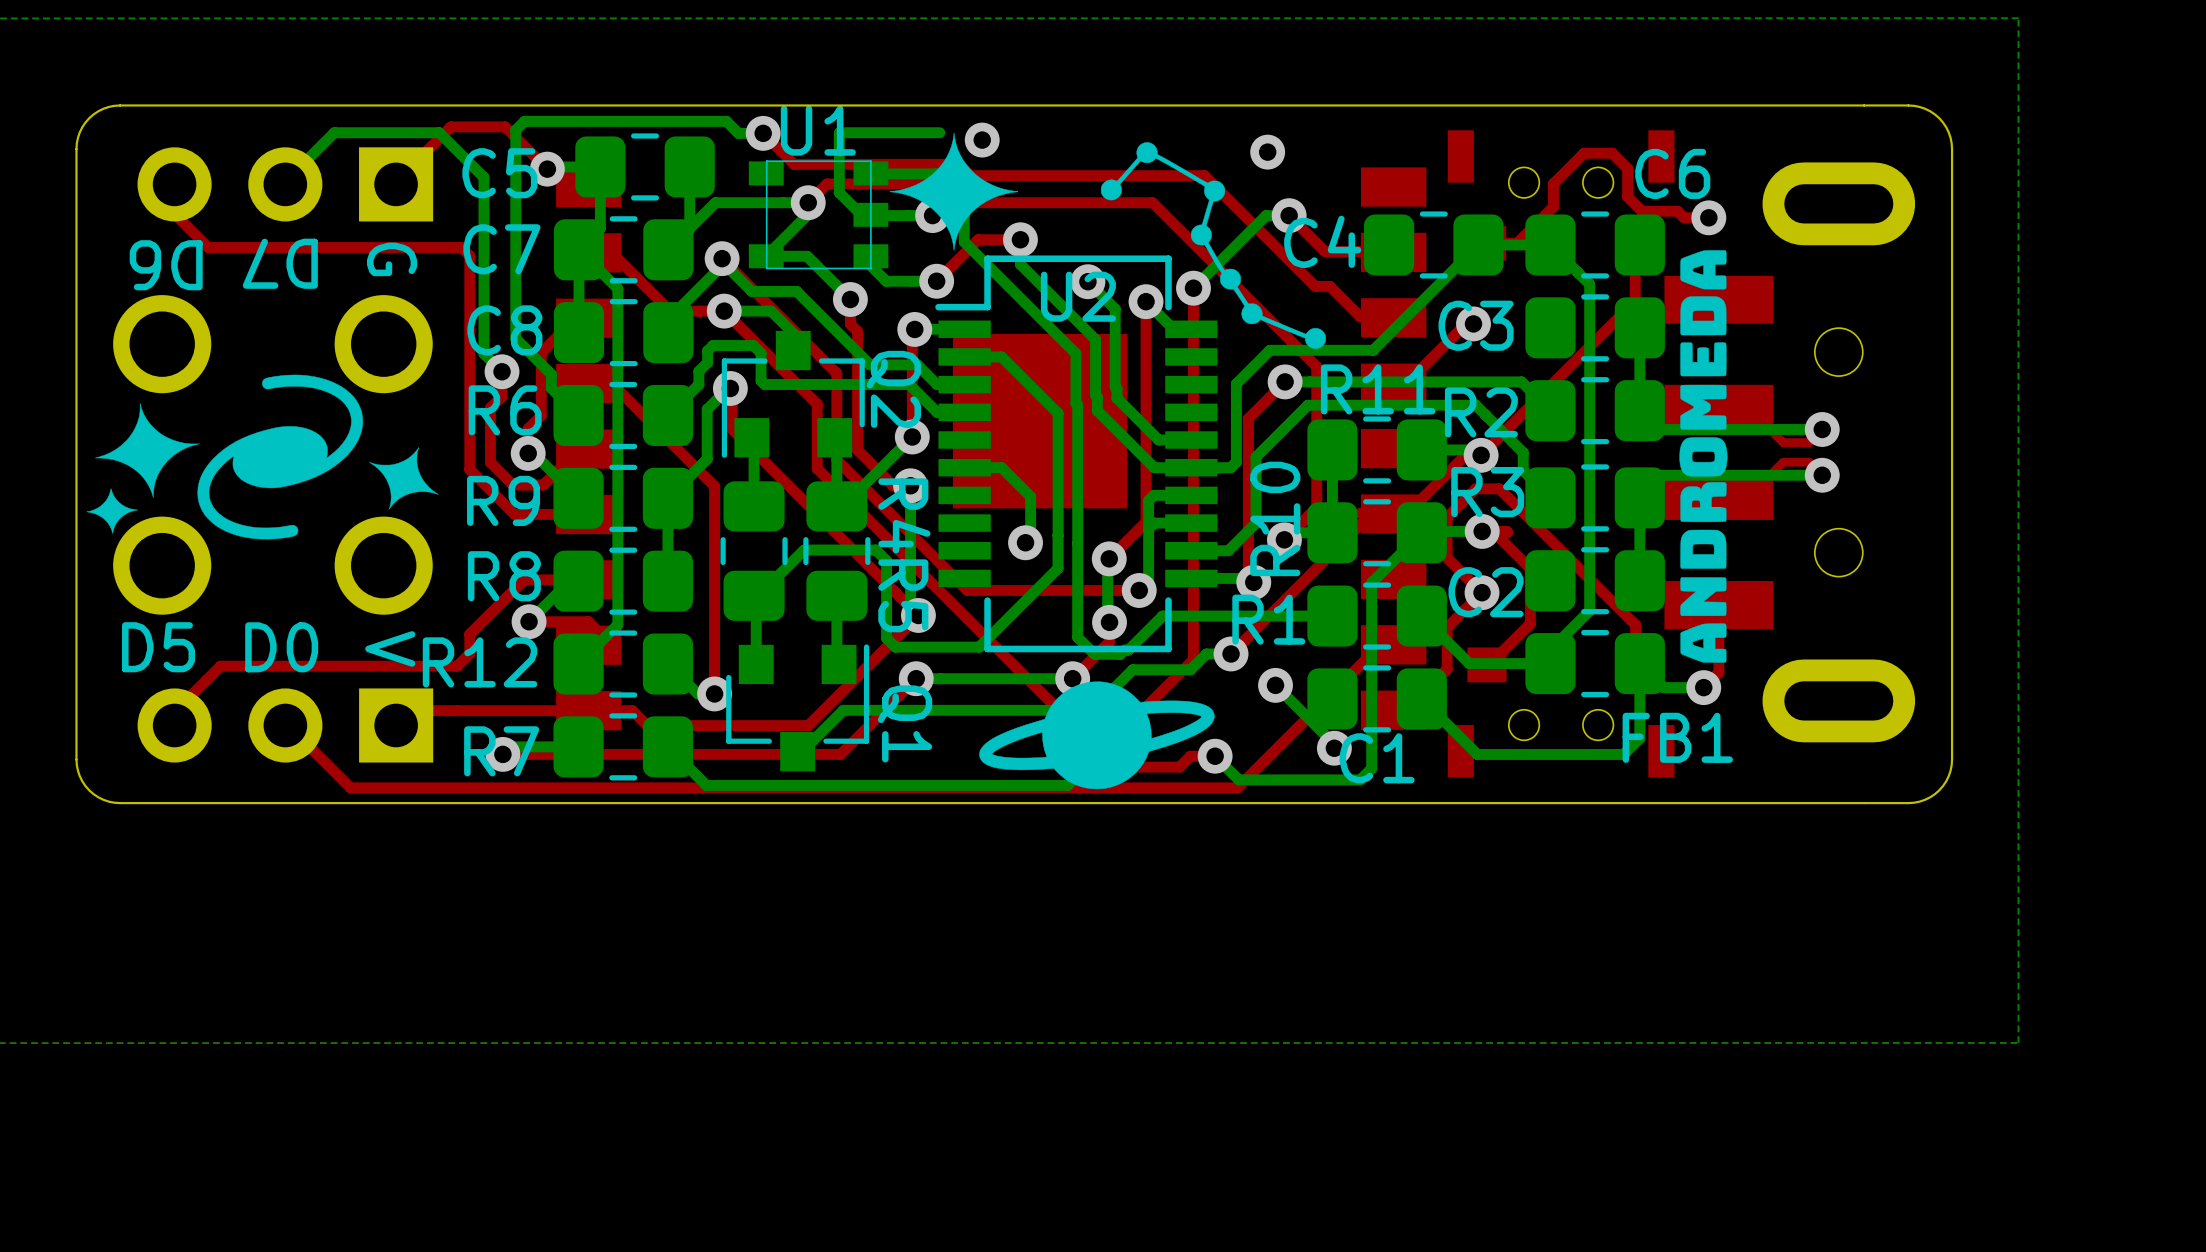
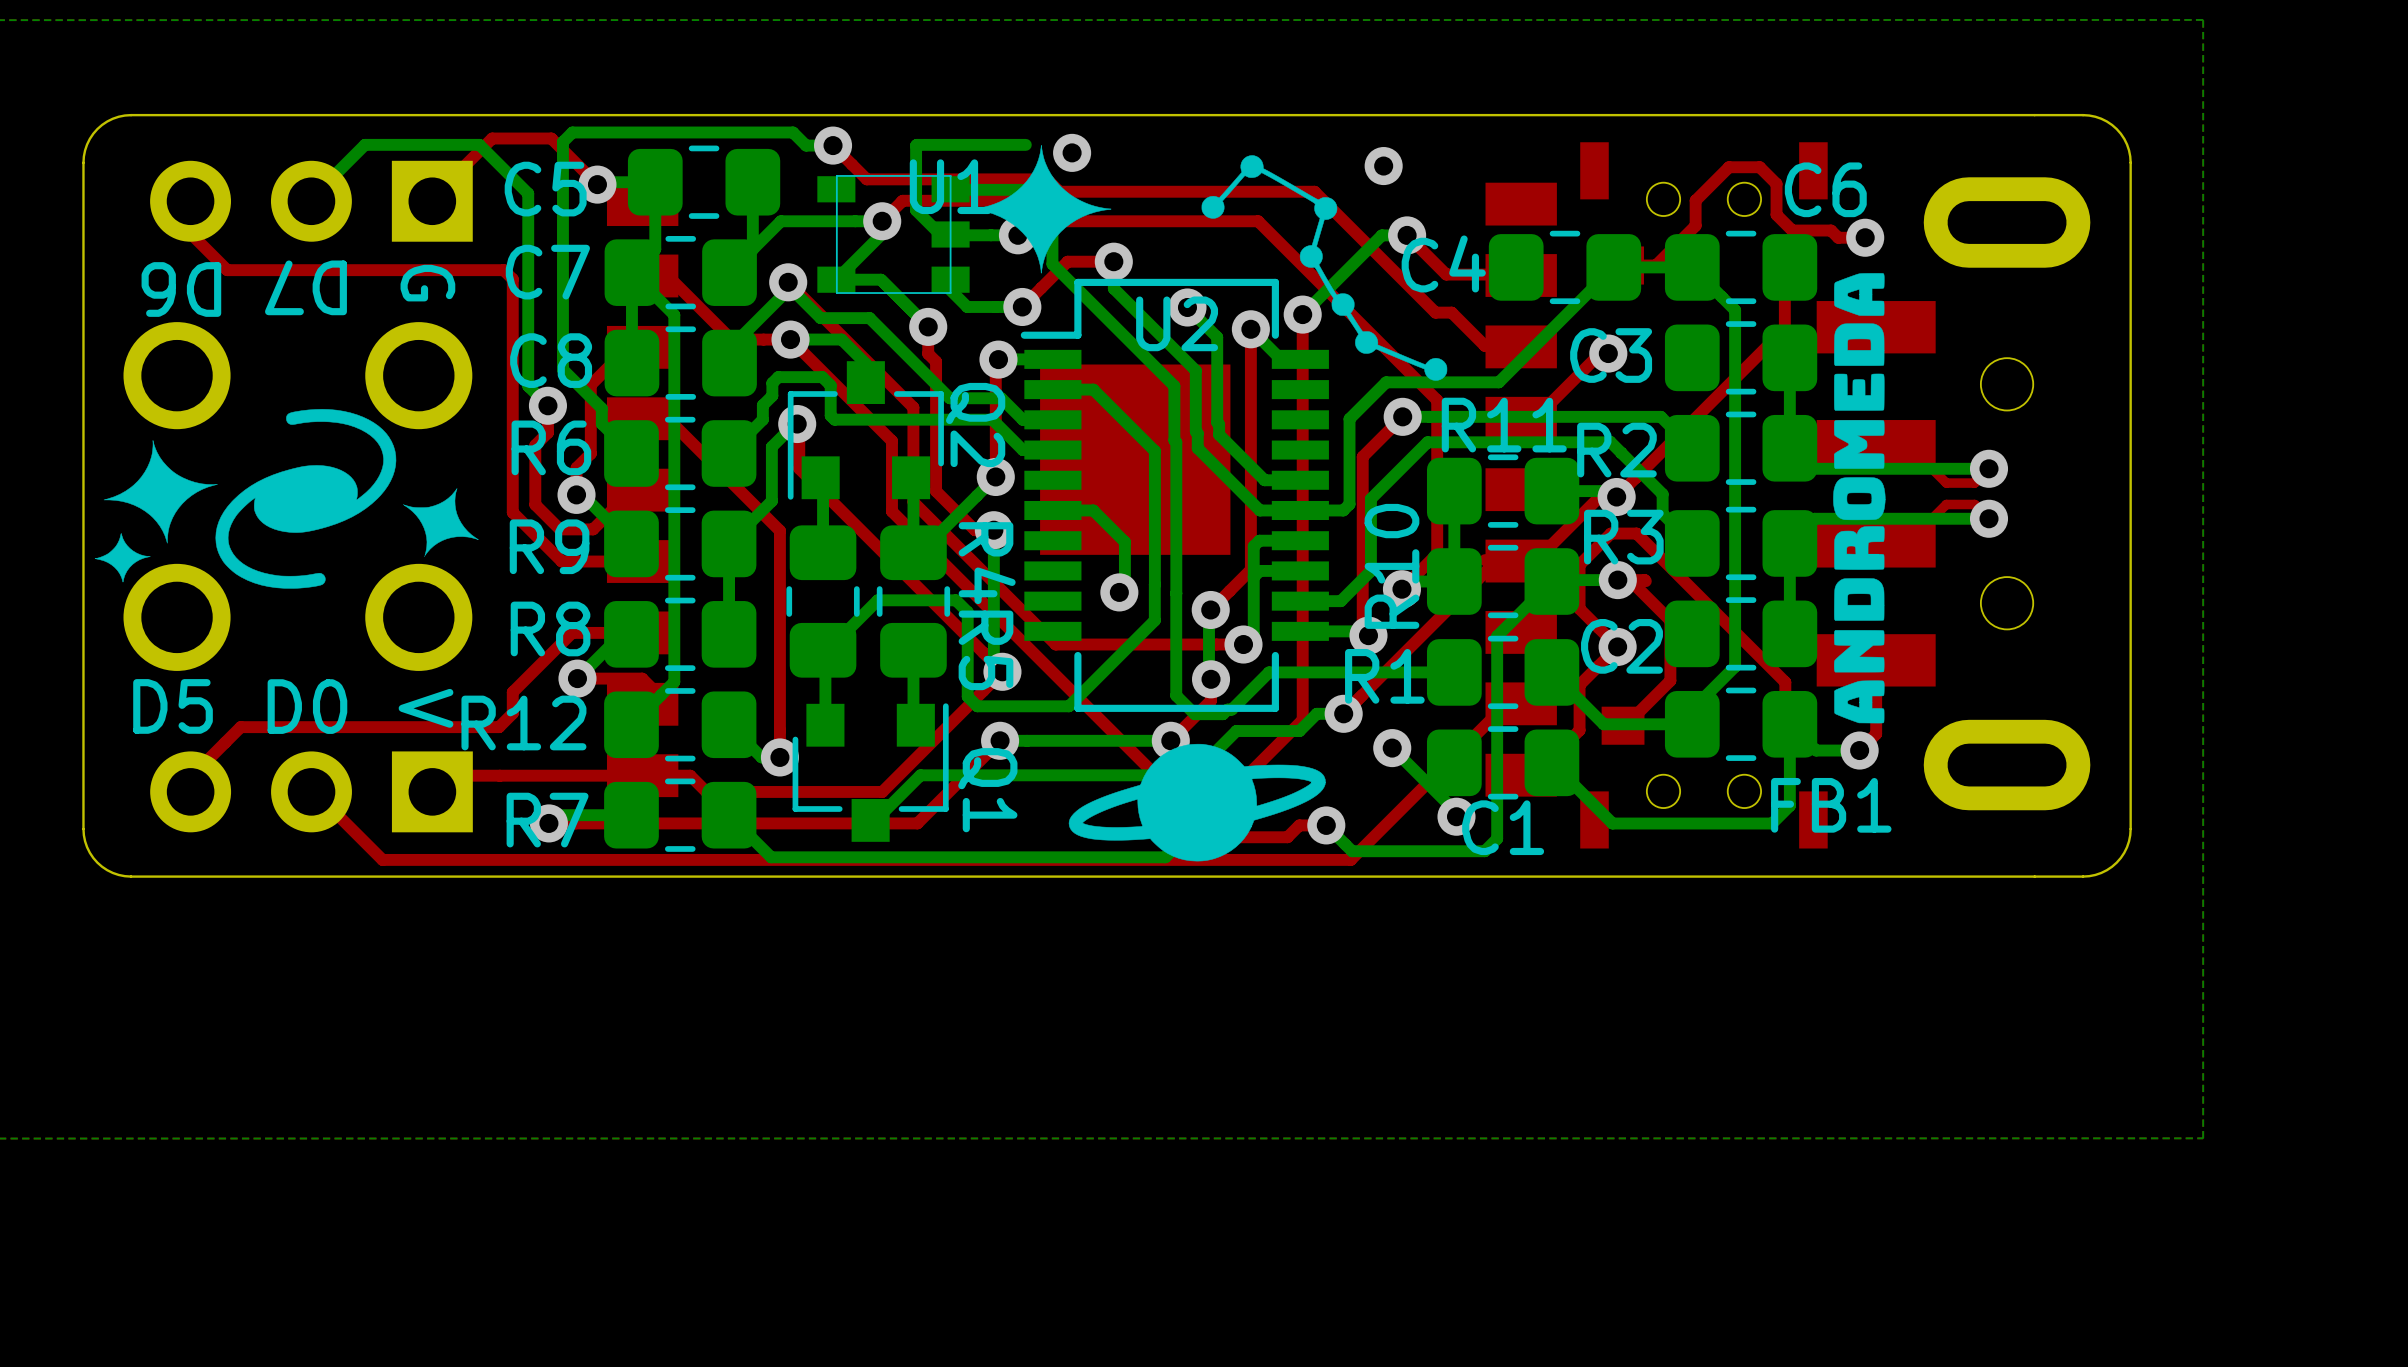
U1 name position: U1 (818, 130) -> U1 (950, 186)

